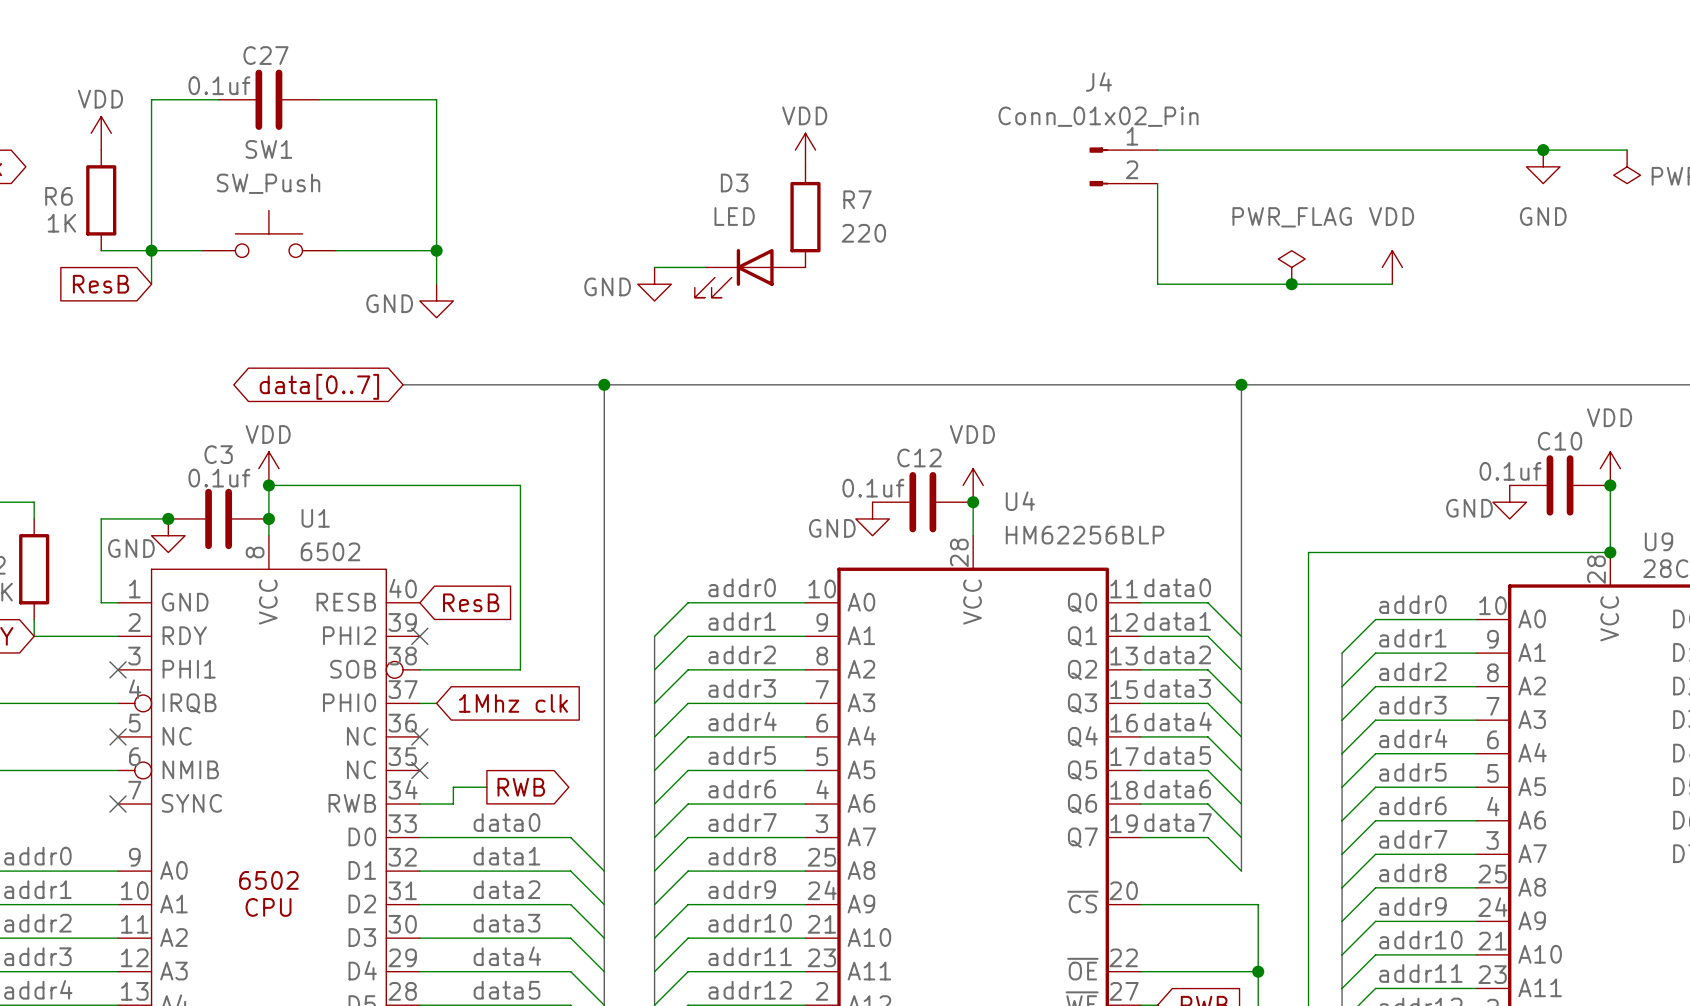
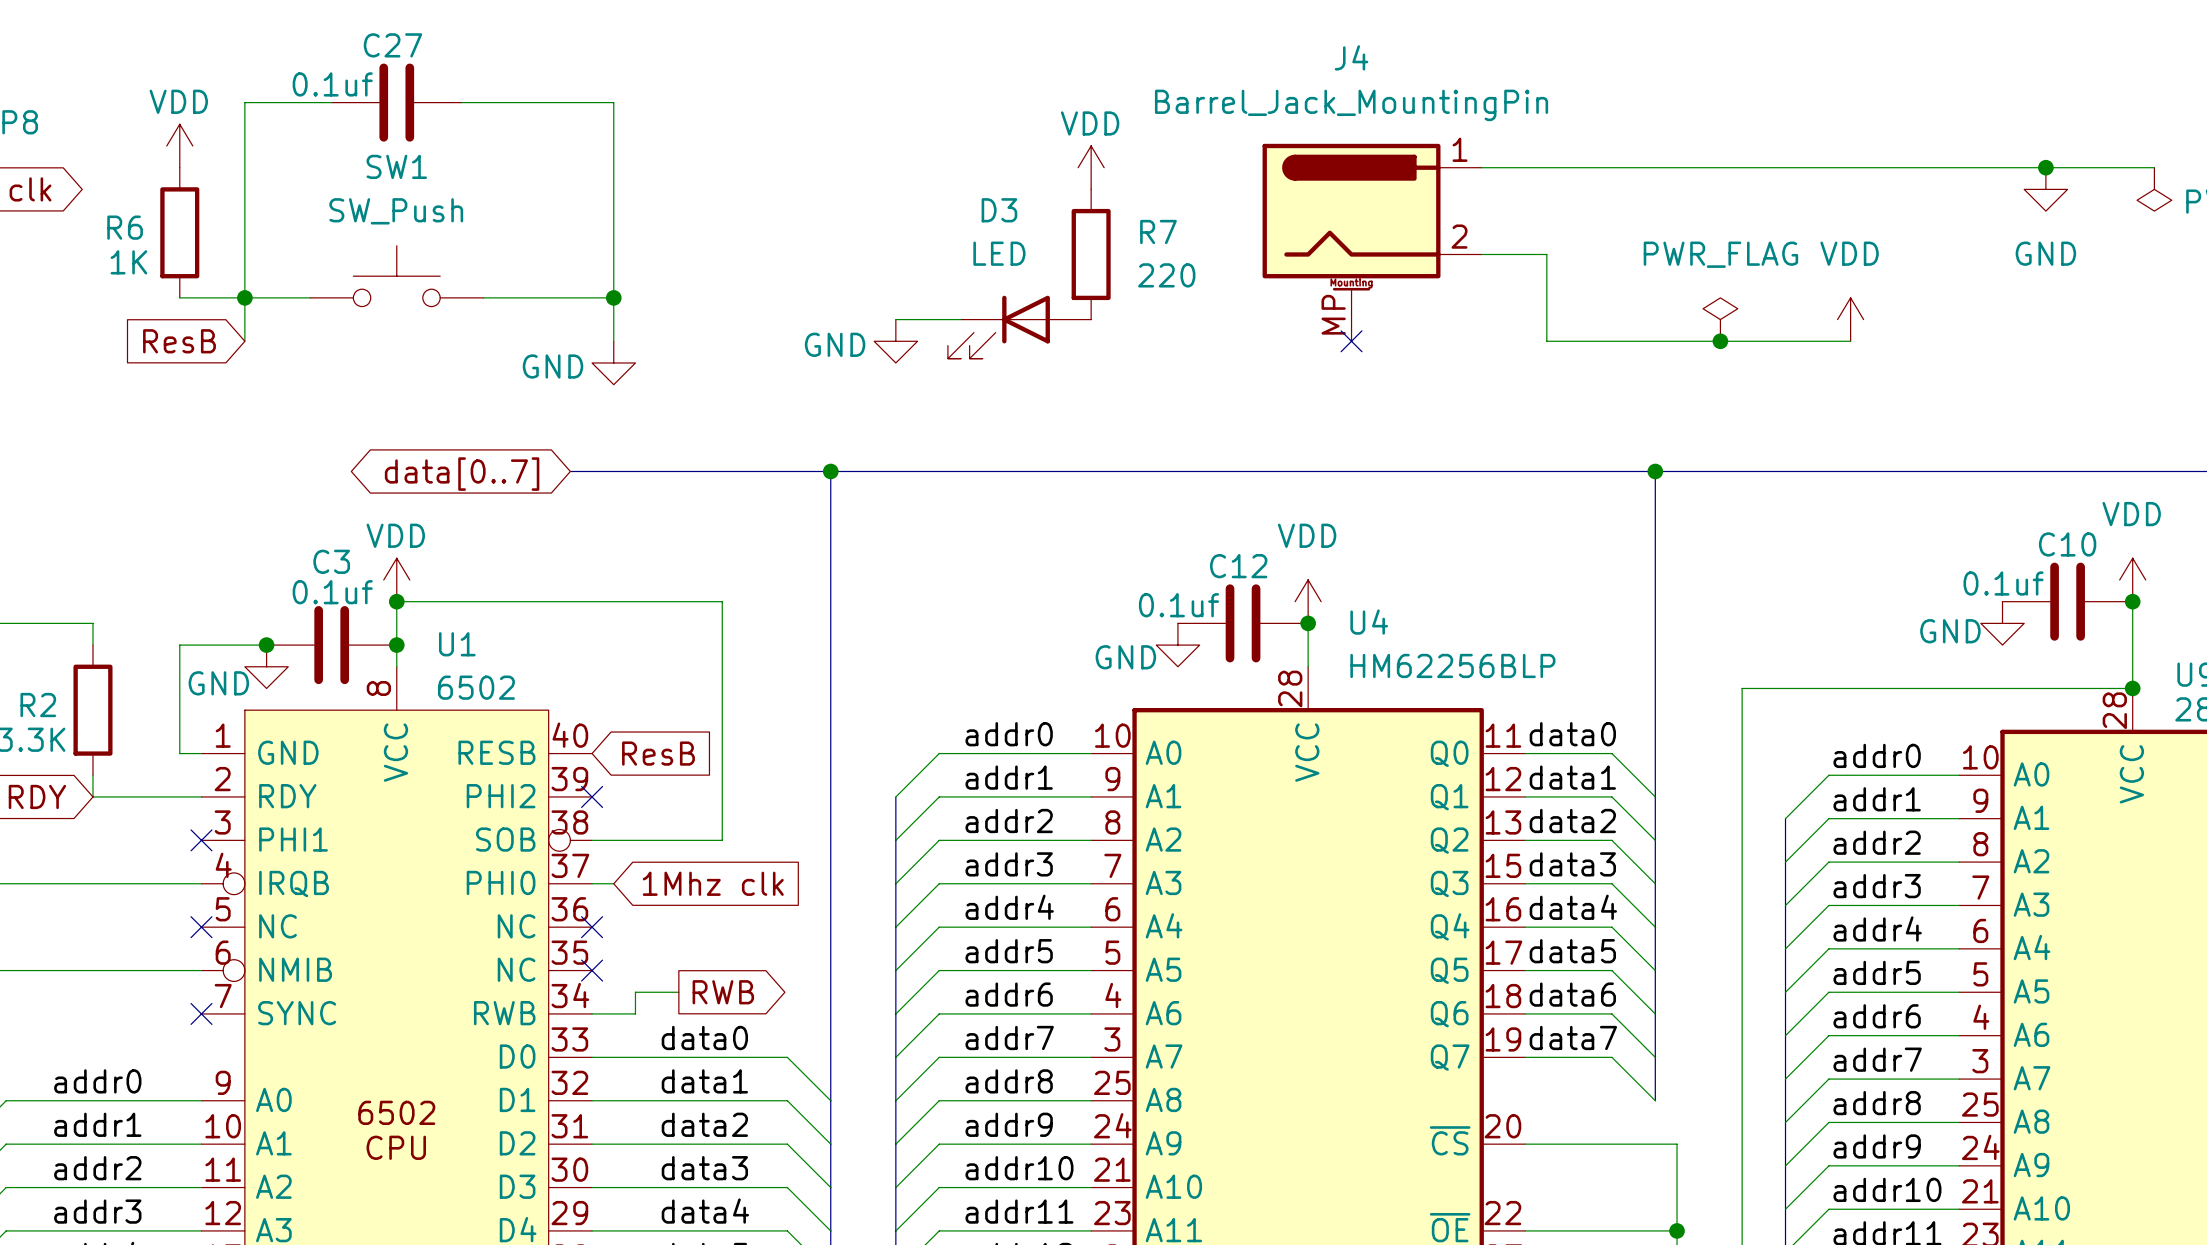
J4 name position: J4 (1098, 81) -> J4 (1351, 57)
J4 value: Conn_01x02_Pin (1098, 116) -> Barrel_Jack_MountingPin (1351, 105)
J4 symbol: [1089, 147, 1158, 187] -> [1262, 143, 1482, 342]
wire: (1157, 183) (1157, 217) -> (1481, 254) (1546, 254)
no-connect mark: none -> (1351, 341)

